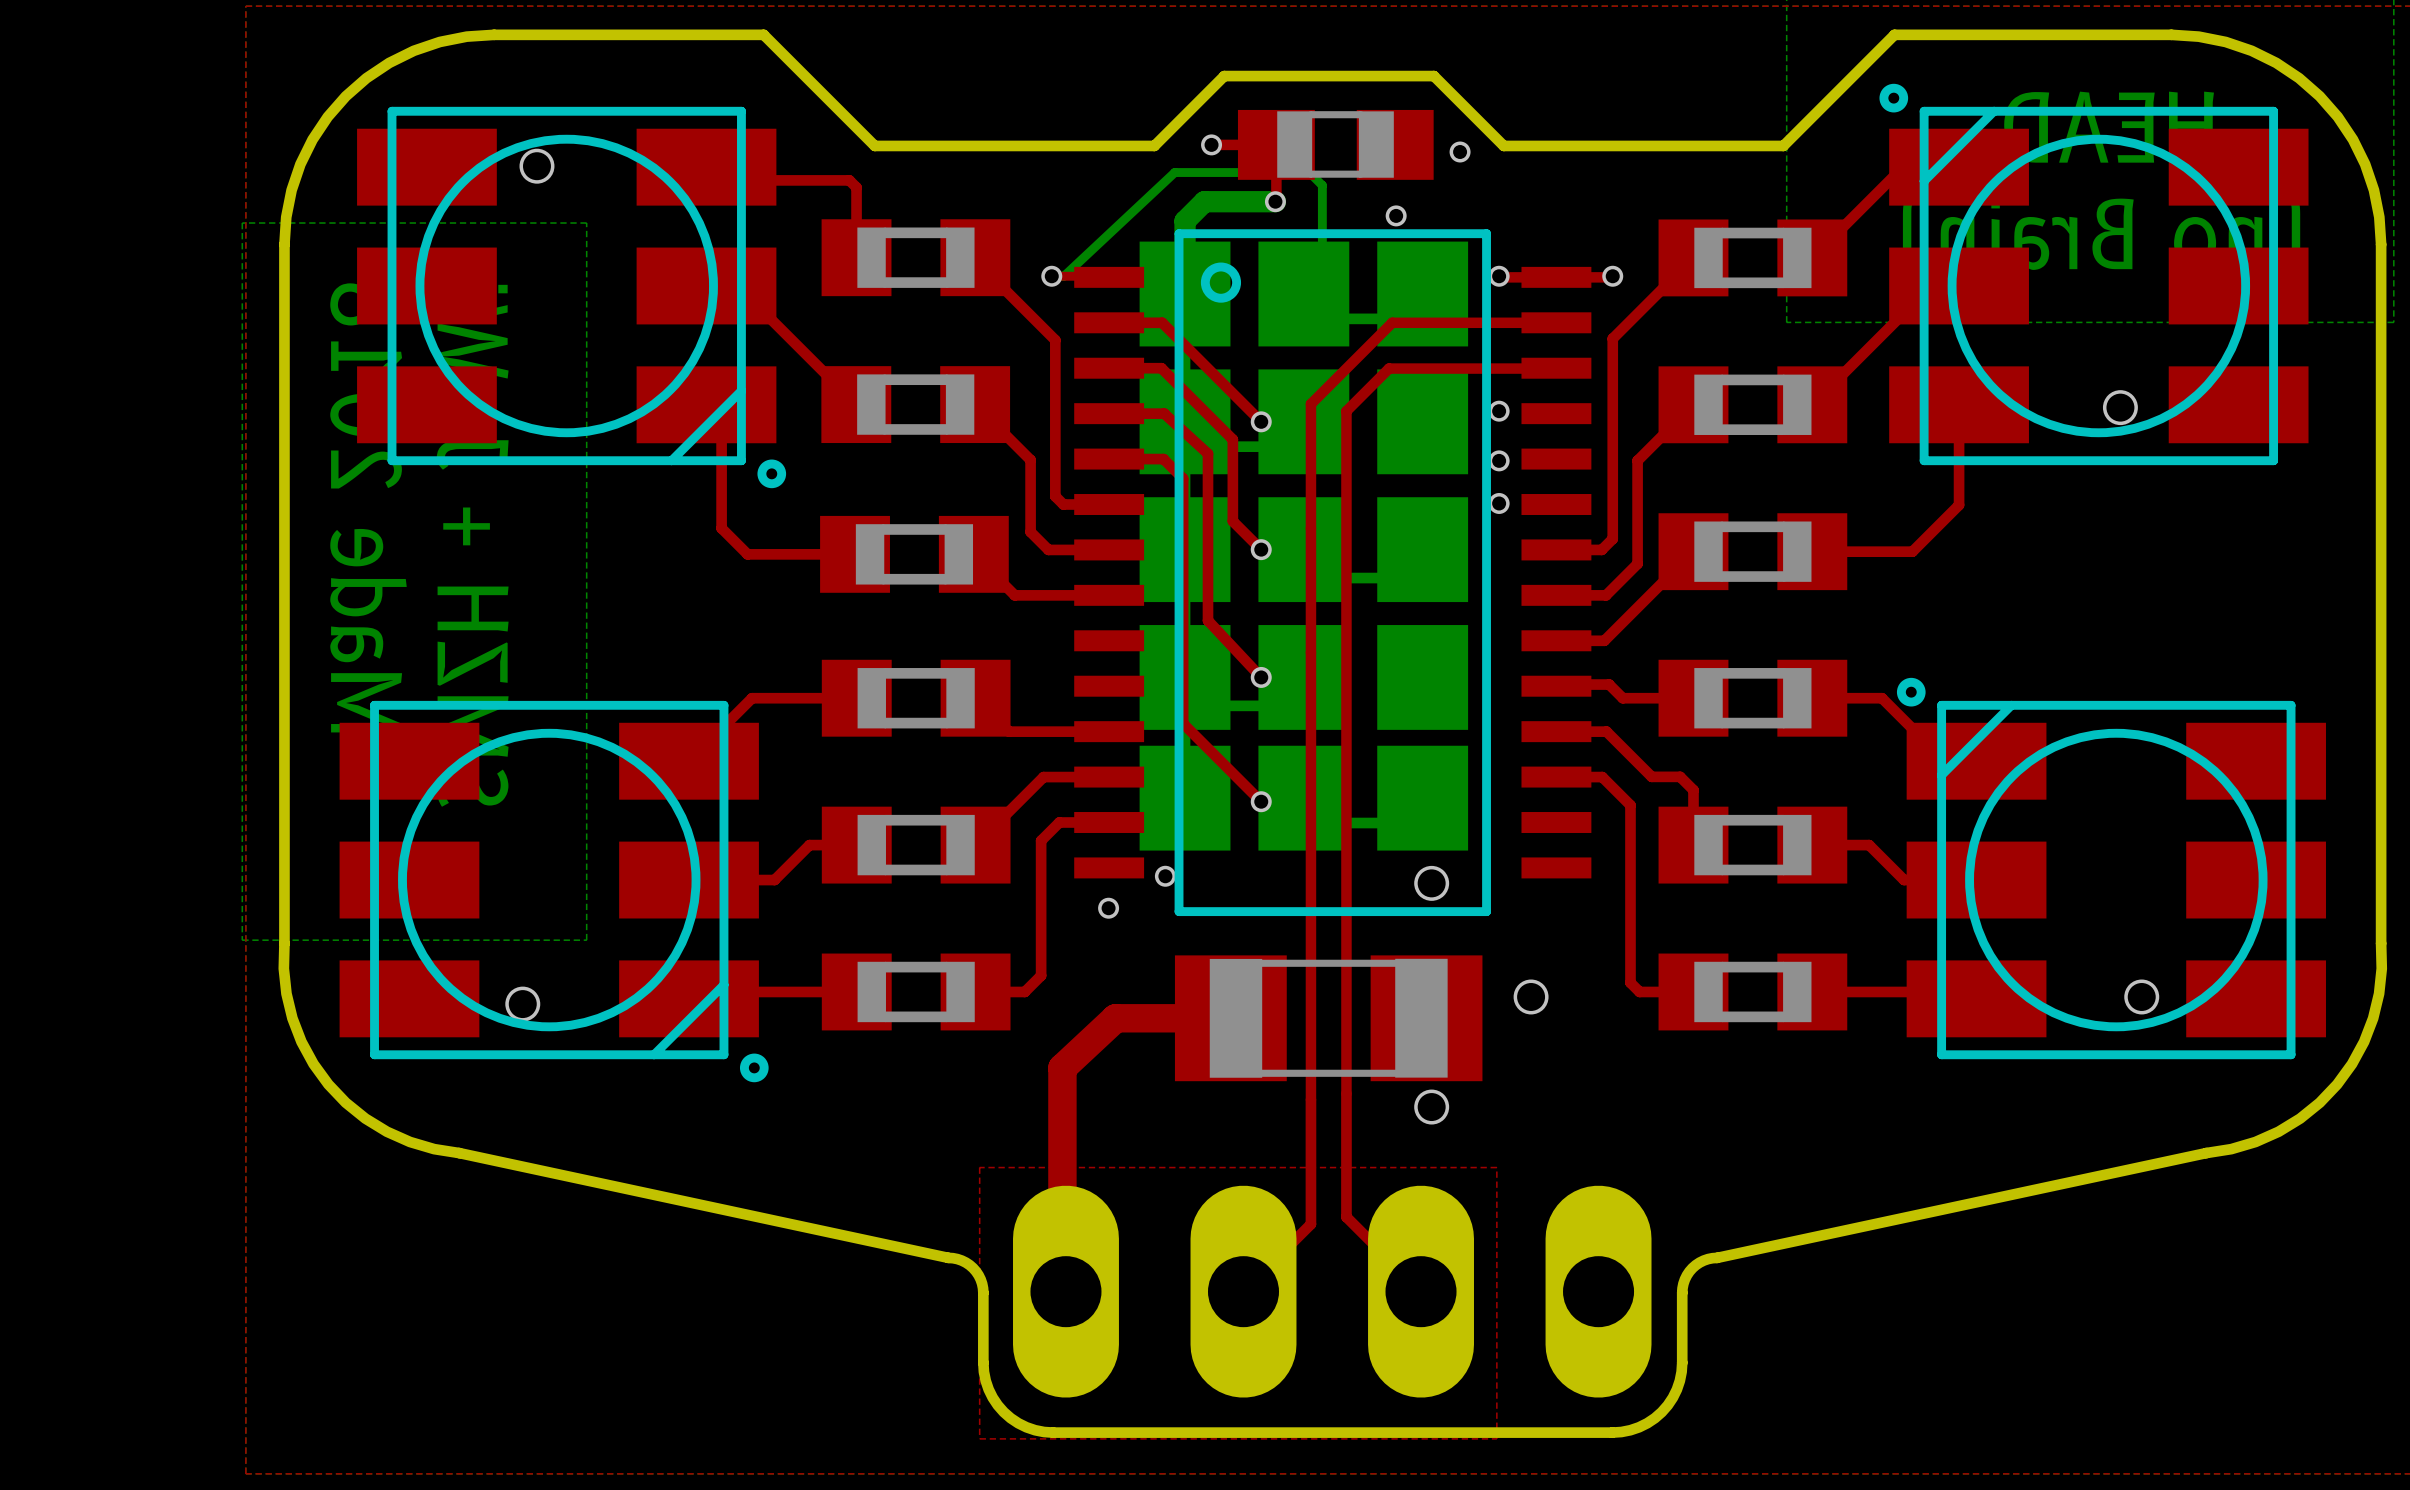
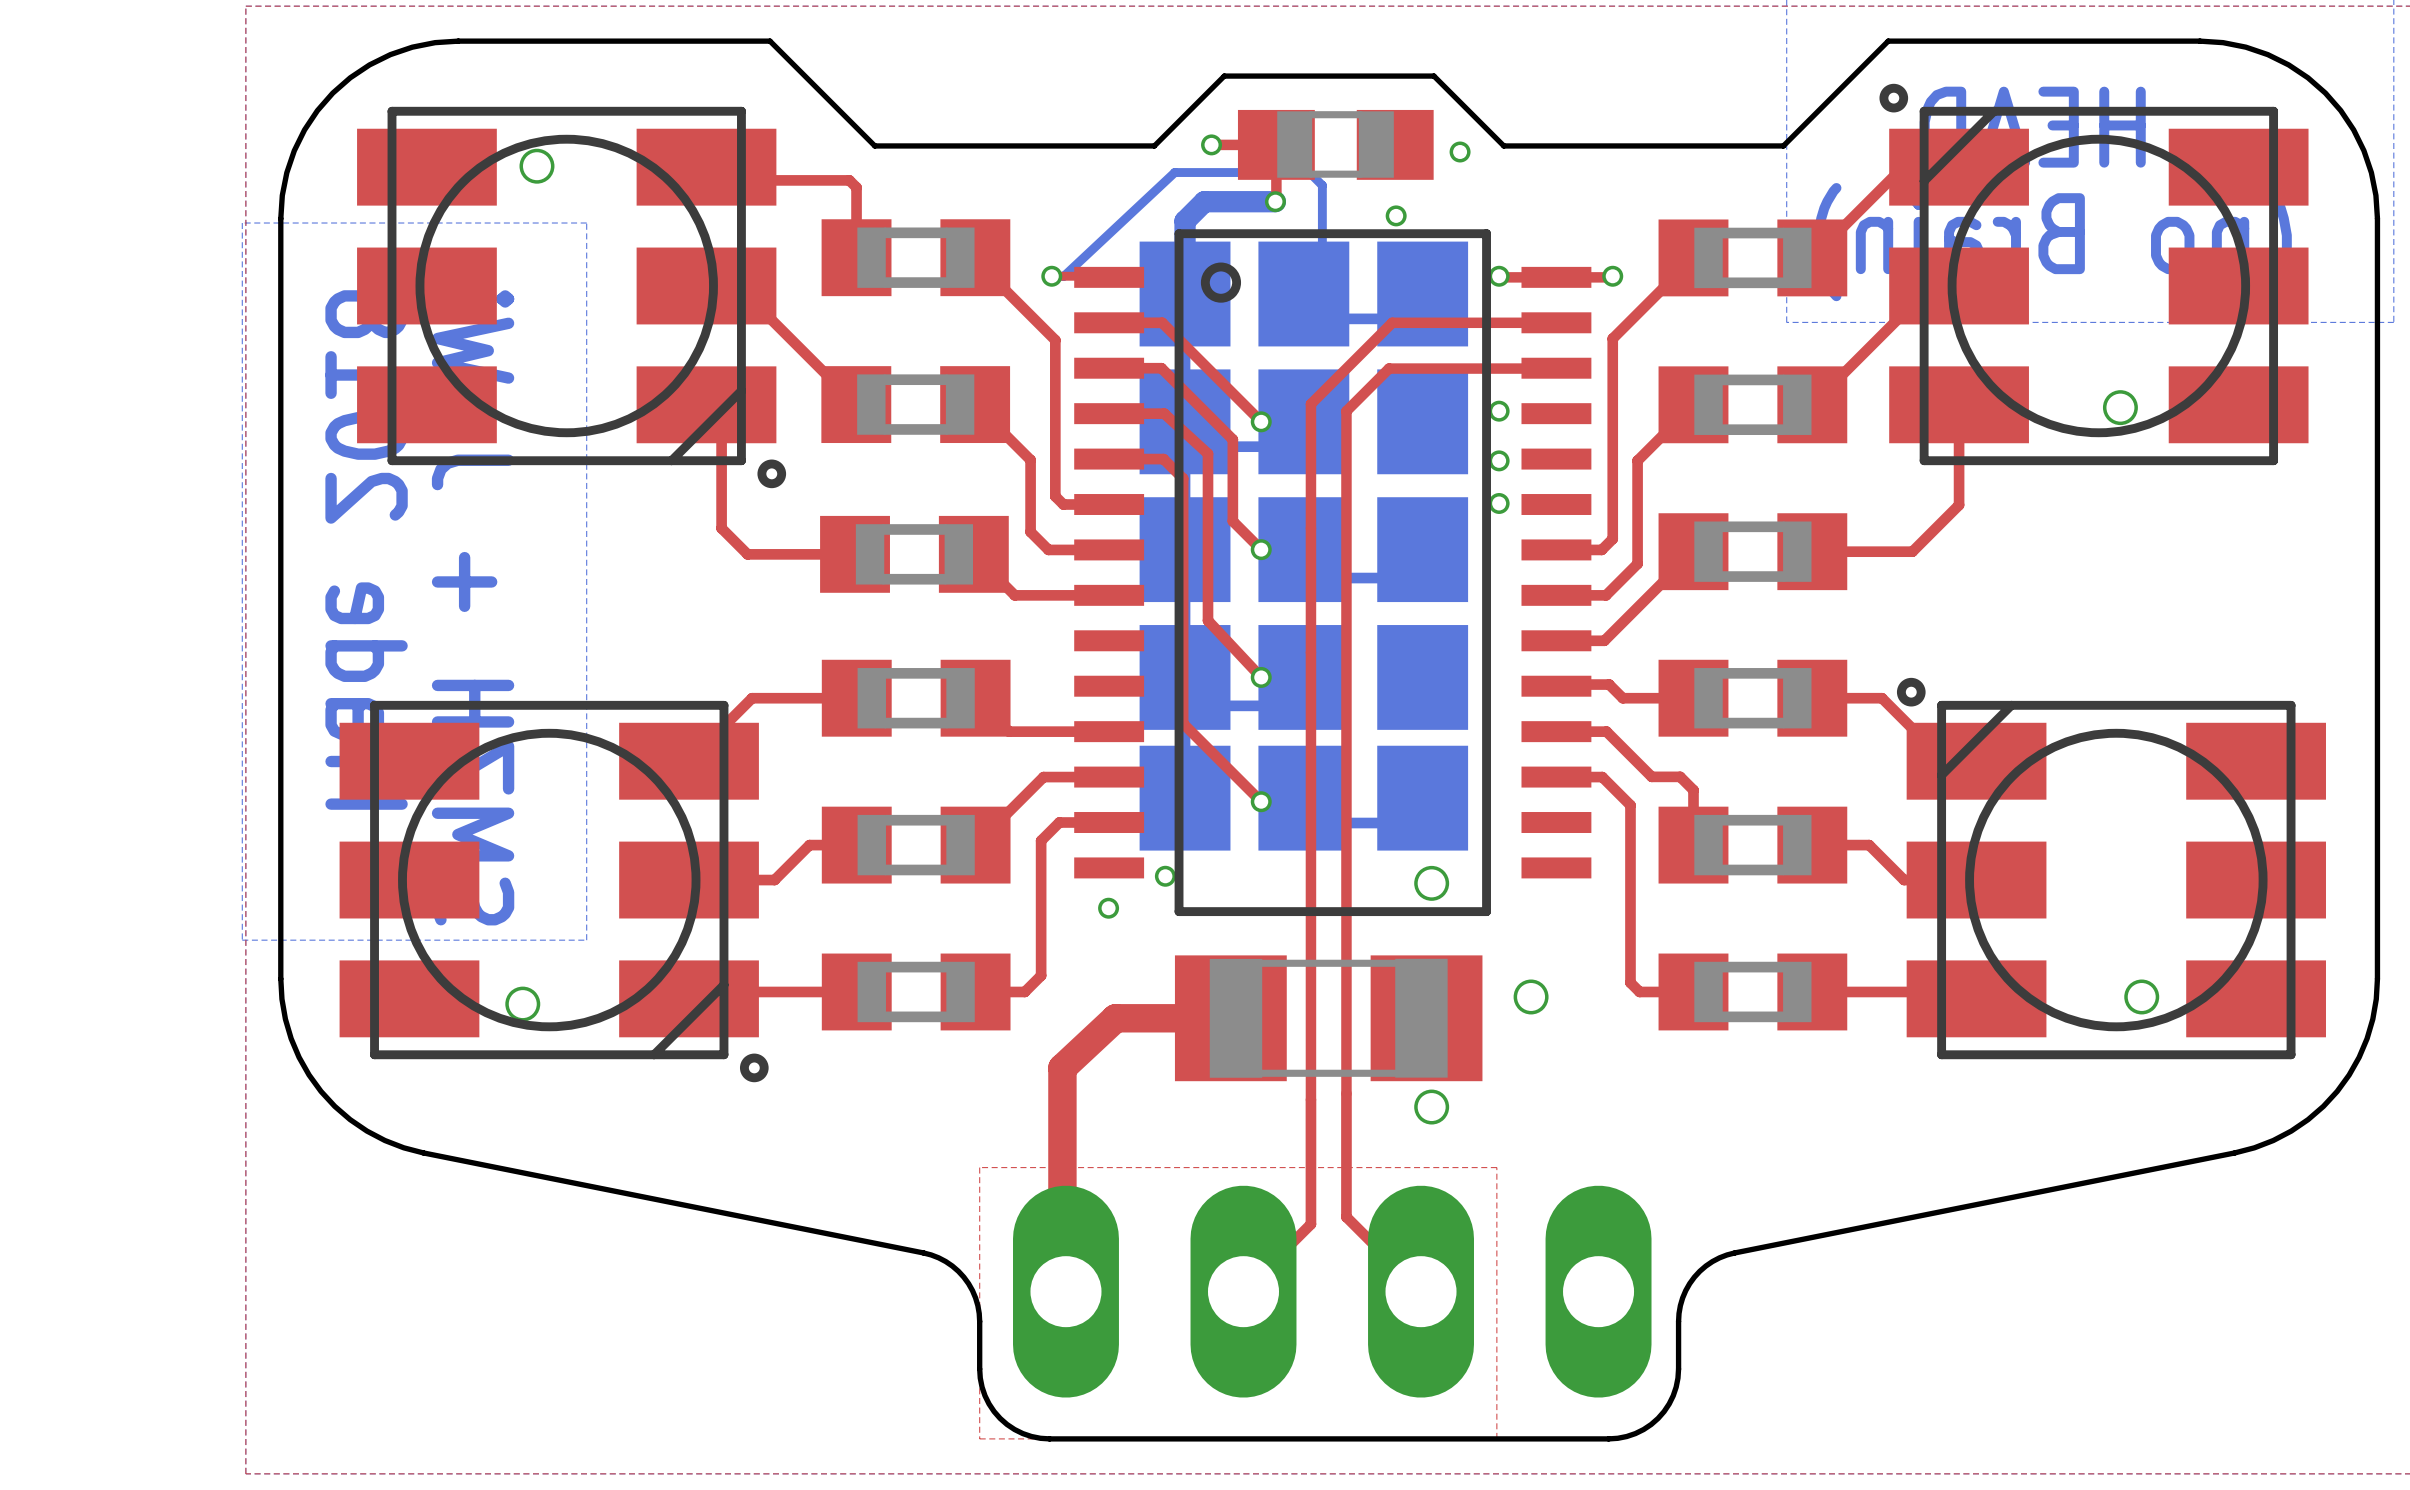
board edge: (770, 41) (763, 34) (494, 34) (466, 36) (439, 41) (413, 50) (389, 62) (366, 78) (345, 96) (327, 116) (312, 139) (300, 164) (291, 190) (286, 217) (284, 244) (283, 968) (286, 993) (292, 1018) (301, 1041) (313, 1064) (328, 1084) (345, 1102) (365, 1118) (386, 1131) (410, 1141) (434, 1149) (957, 1259) (965, 1262) (976, 1271) (982, 1283) (983, 1371) (992, 1397) (1003, 1412) (1018, 1423) (1035, 1430) (1053, 1432) (1612, 1432) (1630, 1430) (1654, 1418) (1667, 1405) (1676, 1389) (1682, 1362) (1682, 1288) (1689, 1271) (1699, 1262) (1708, 1259) (2231, 1149) (2255, 1141) (2278, 1131) (2300, 1118) (2319, 1102) (2337, 1084) (2352, 1064) (2364, 1041) (2373, 1018) (2379, 993) (2381, 968) (2381, 244) (2379, 217) (2373, 190) (2365, 164) (2353, 139) (2337, 116) (2319, 96) (2299, 78) (2276, 62) (2251, 50) (2225, 41) (2198, 36) (2171, 34) (1894, 34) (1888, 41) -> (770, 41) (435, 42) (412, 47) (390, 54) (369, 64) (350, 77) (332, 93) (317, 110) (304, 129) (294, 150) (286, 172) (282, 195) (280, 218) (280, 978) (285, 1019) (299, 1057) (321, 1091) (350, 1119) (384, 1140) (403, 1147) (923, 1252) (945, 1261) (963, 1277) (975, 1297) (979, 1313) (980, 1378) (989, 1403) (1000, 1418) (1014, 1429) (1031, 1436) (1049, 1438) (1608, 1438) (1626, 1436) (1651, 1424) (1669, 1403) (1677, 1378) (1679, 1313) (1682, 1297) (1689, 1283) (1699, 1271) (1719, 1257) (1734, 1252) (2254, 1147) (2273, 1140) (2308, 1119) (2337, 1091) (2349, 1075) (2367, 1038) (2376, 999) (2377, 978) (2377, 218) (2375, 195) (2371, 172) (2363, 150) (2353, 129) (2340, 110) (2325, 93) (2308, 77) (2288, 64) (2267, 54) (2245, 47) (2223, 42) (2199, 41) (1888, 41)
board edge width: thick (770, 41) (874, 145) (1154, 145) (1224, 76) (1433, 76) (1503, 145) (1783, 145) (1888, 41) -> thin (770, 41) (874, 145) (1154, 145) (1224, 76) (1433, 76) (1503, 145) (1783, 145) (1888, 41)

